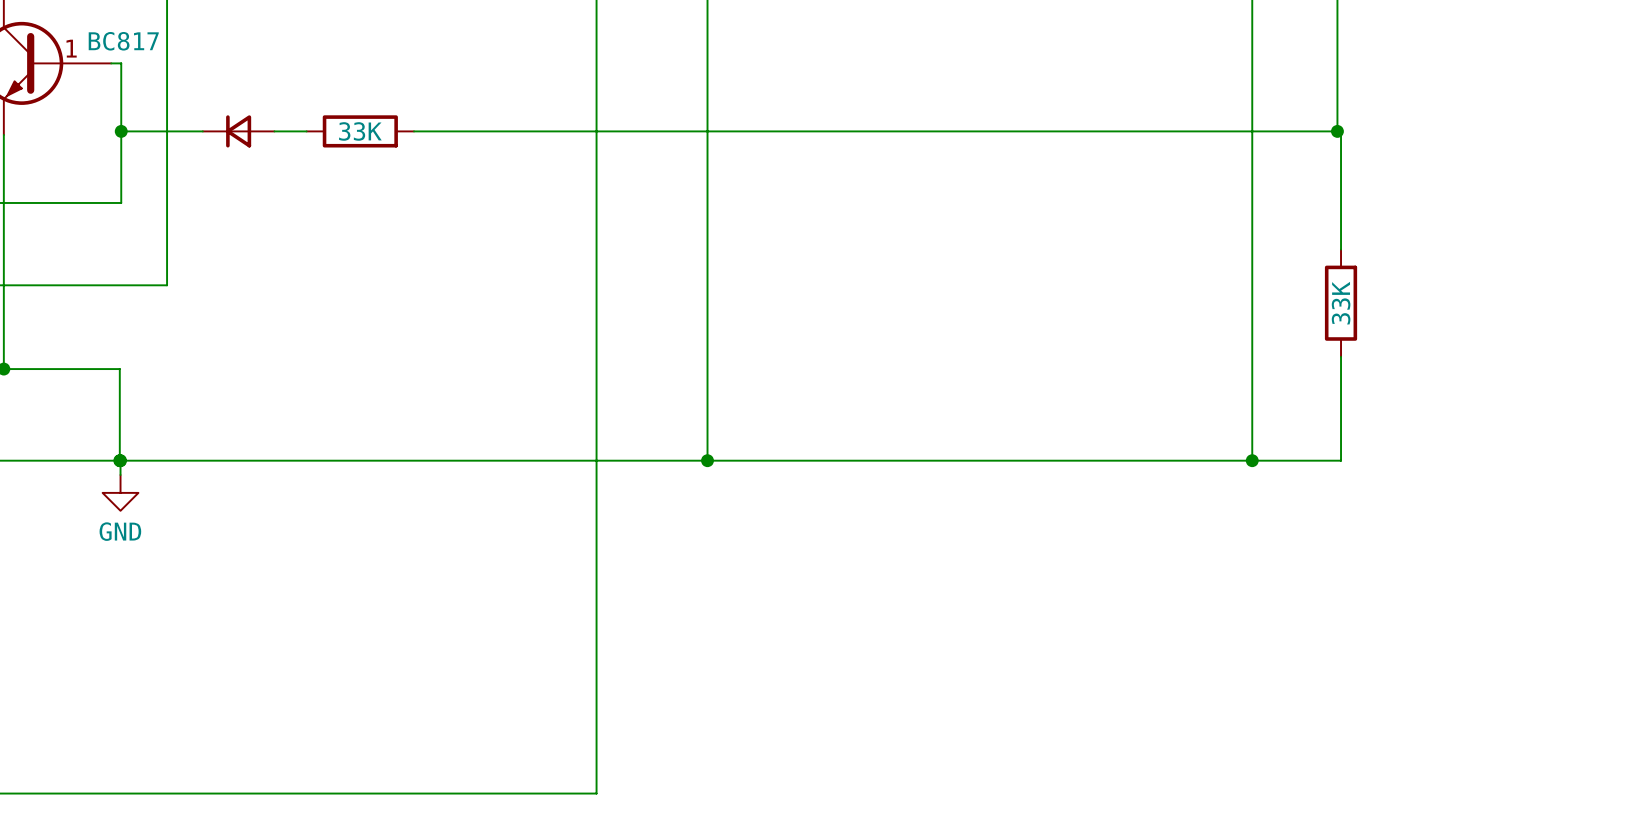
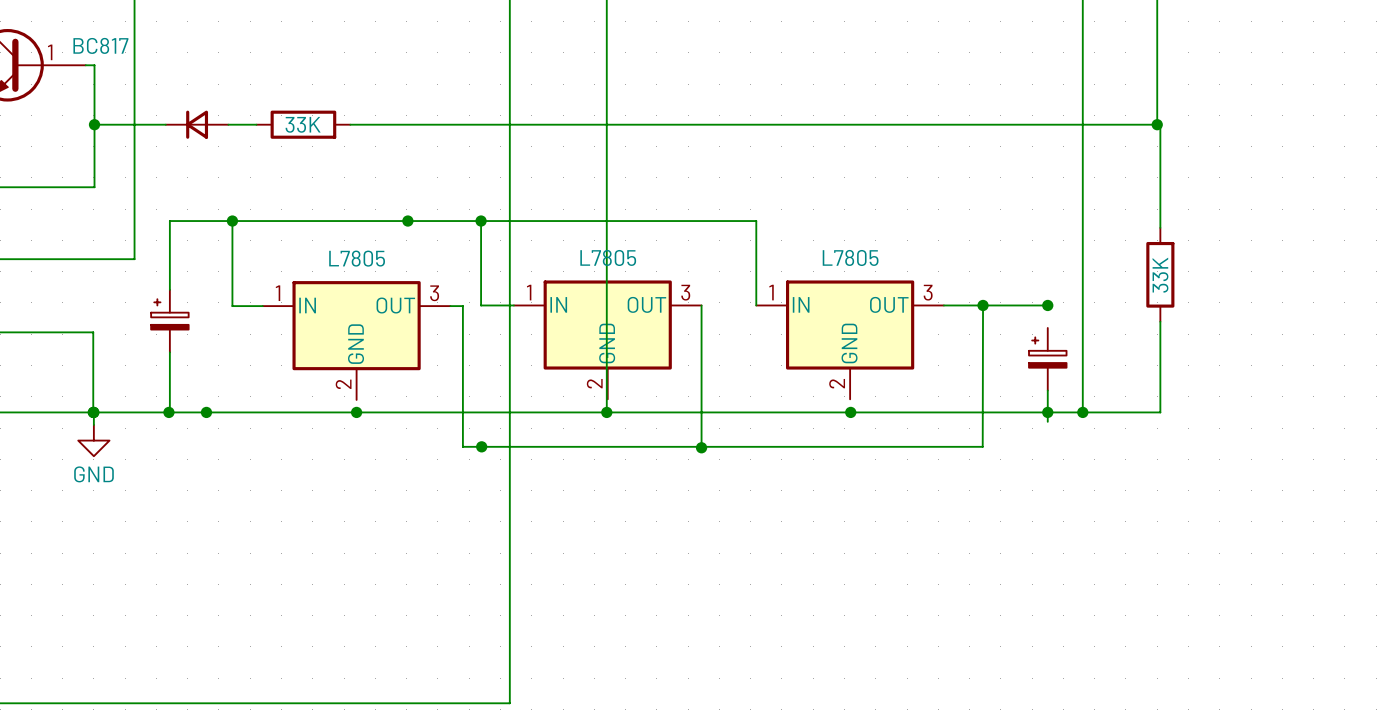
wire: none -> (232, 221) (232, 306) (262, 306)
junction: none -> (232, 221)
junction: none -> (407, 221)
wire: none -> (481, 221) (481, 305) (513, 305)
junction: none -> (481, 221)
wire: none -> (169, 289) (169, 221) (756, 221) (756, 305)
wire: none -> (450, 306) (462, 306) (462, 446) (701, 447)
wire: none -> (701, 305) (701, 447)
wire: none -> (943, 305) (1047, 305)
wire: none -> (983, 305) (982, 446) (701, 447)
junction: none -> (983, 305)
junction: none -> (1047, 305)
part: none -> (169, 321)
part: none -> L7805 (607, 339)
part: none -> L7805 (850, 339)
part: none -> L7805 (356, 340)
wire: none -> (169, 352) (168, 412)
part: none -> (1047, 359)
wire: none -> (1047, 390) (1047, 421)
junction: none -> (168, 412)
junction: none -> (206, 412)
junction: none -> (356, 412)
junction: none -> (850, 412)
junction: none -> (1047, 412)
junction: none -> (481, 446)
junction: none -> (701, 447)

